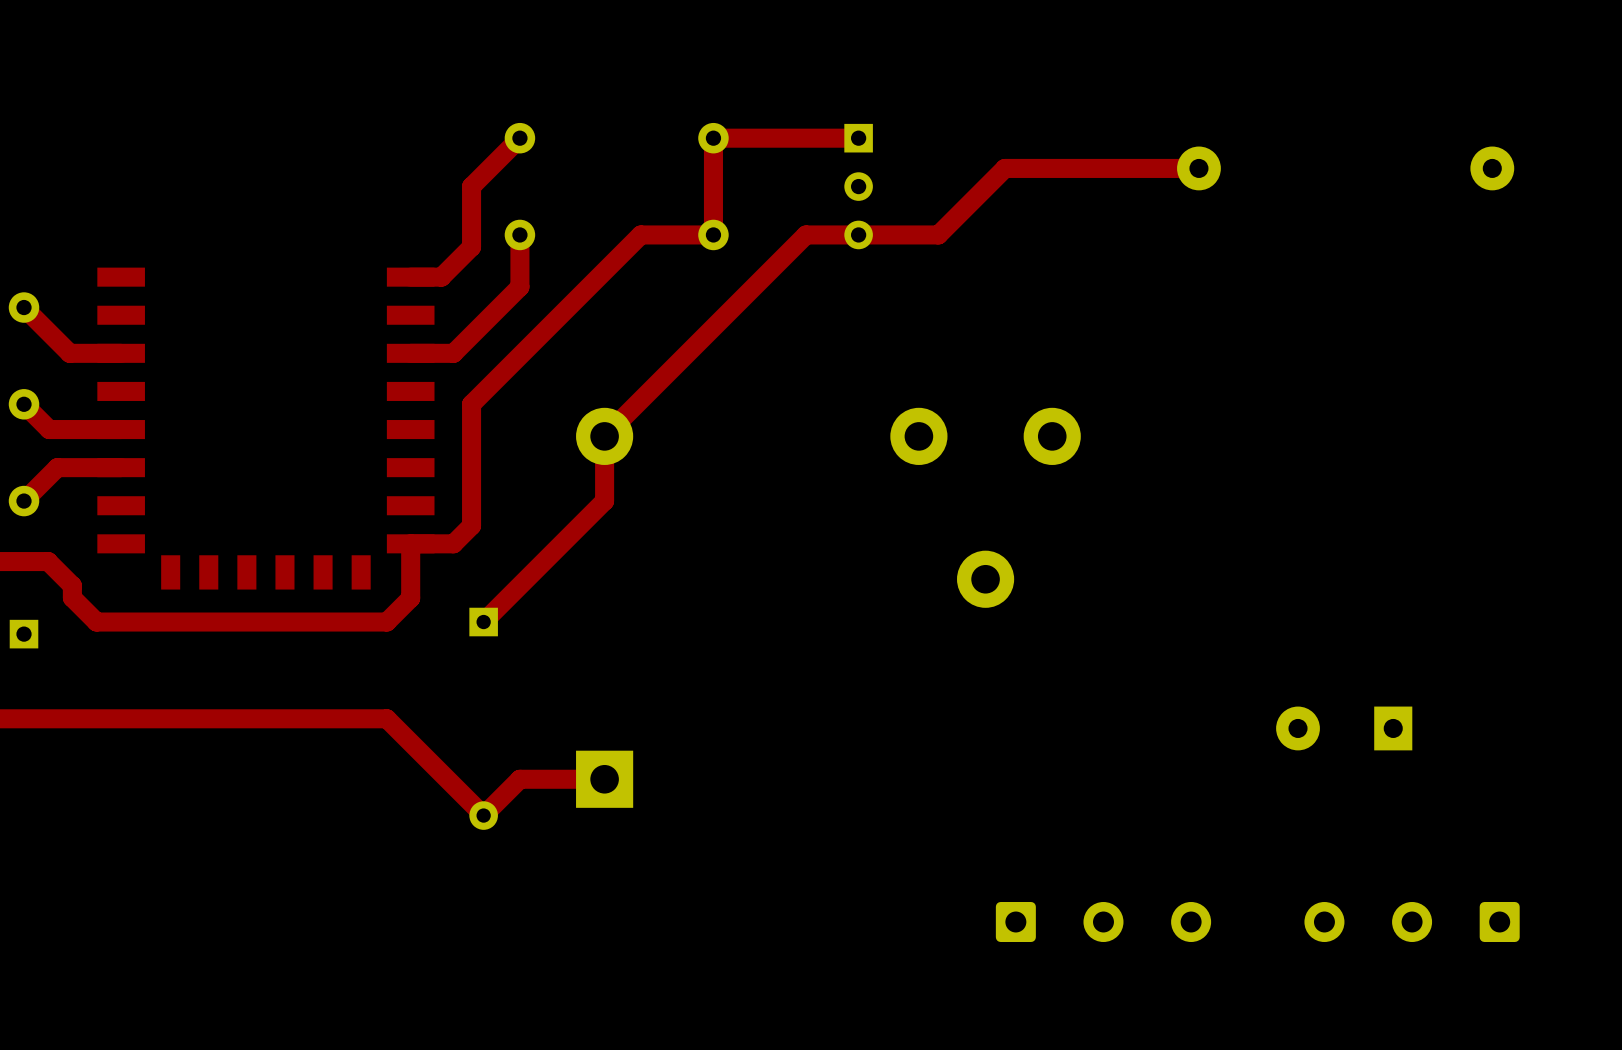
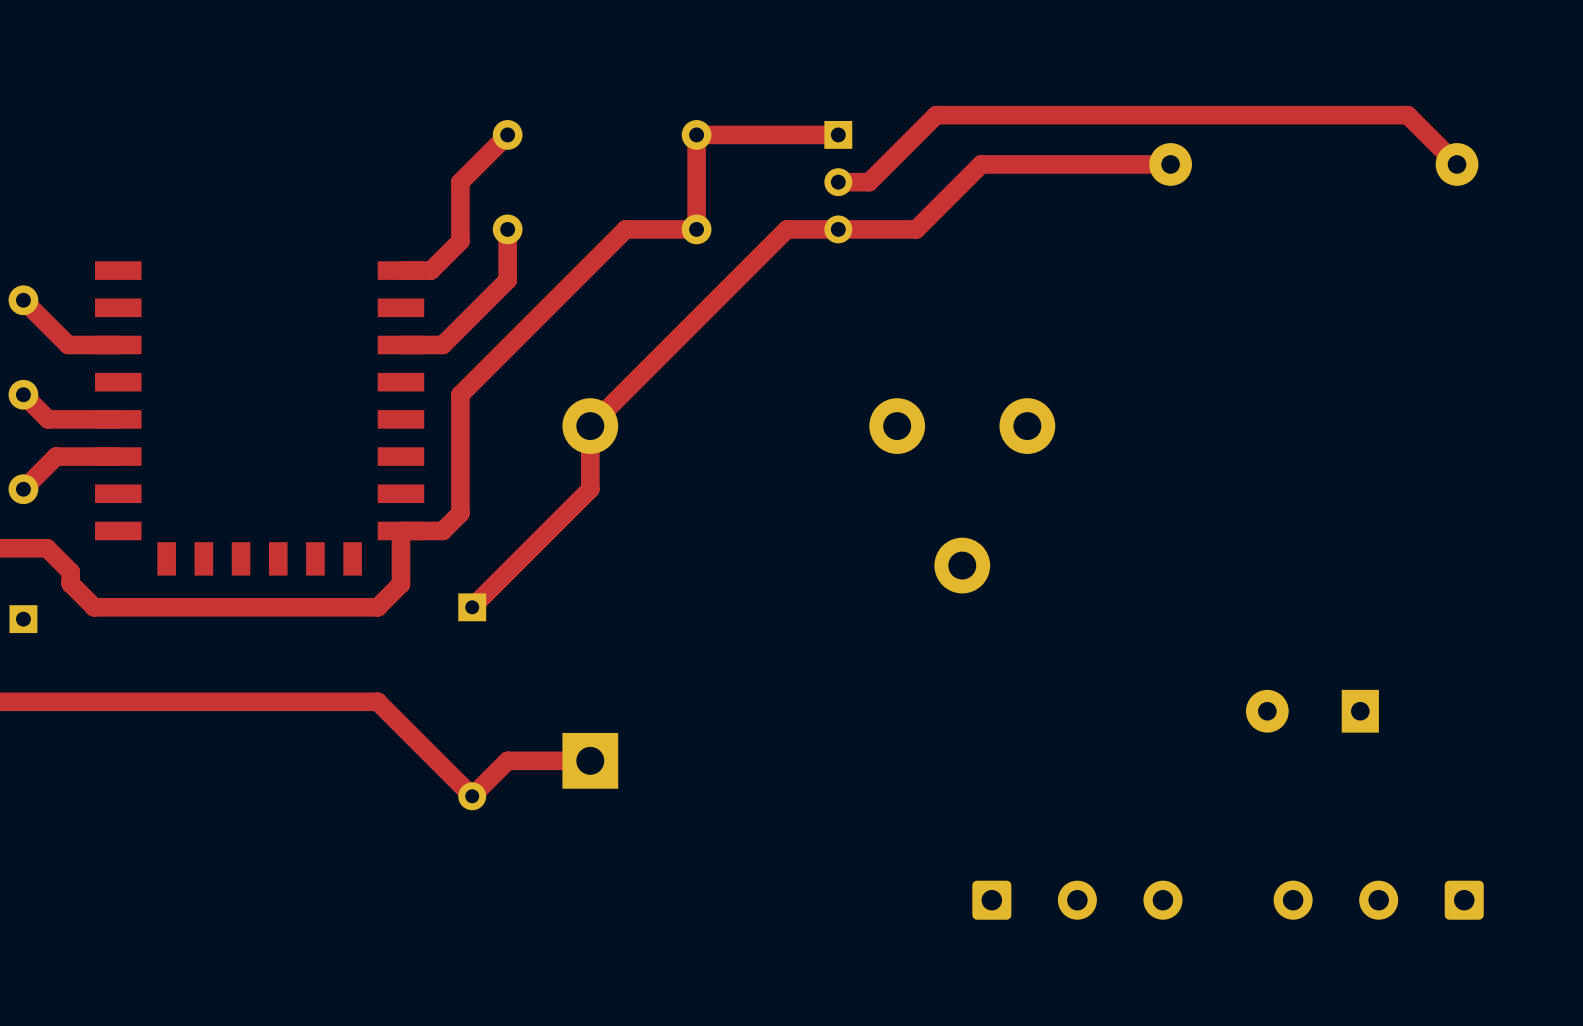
top track: none -> (1457, 164) (1407, 115) (936, 115) (869, 182) (838, 182)

